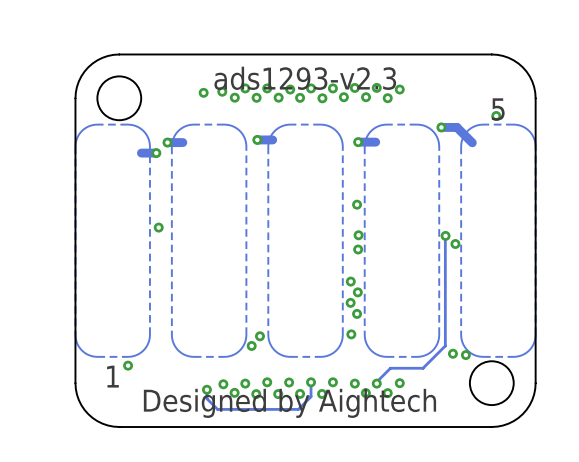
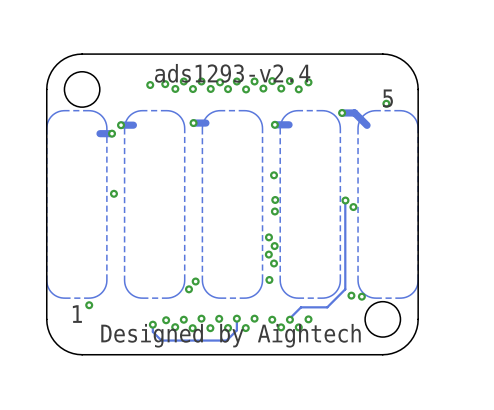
text: ads1293-v2.3 (305, 78) -> ads1293-v2.4 (232, 73)

